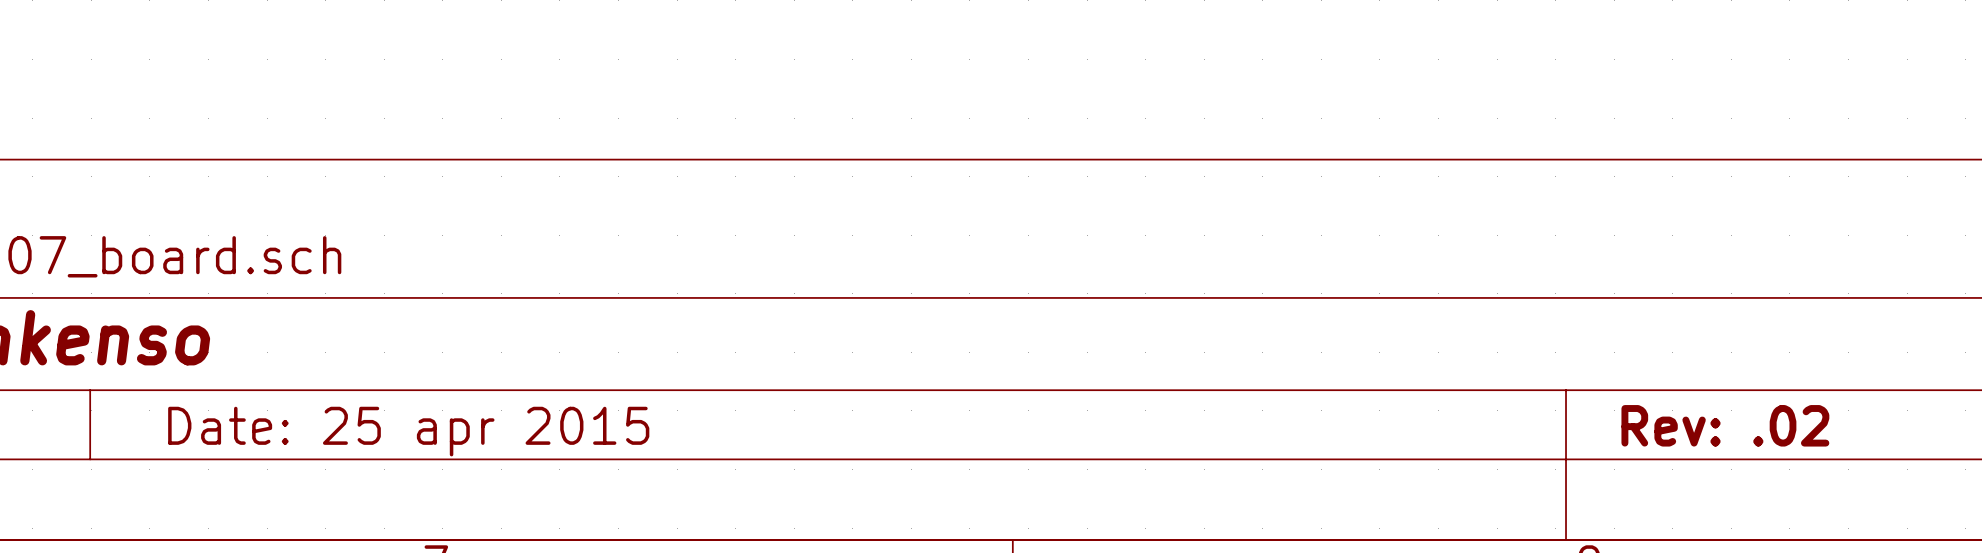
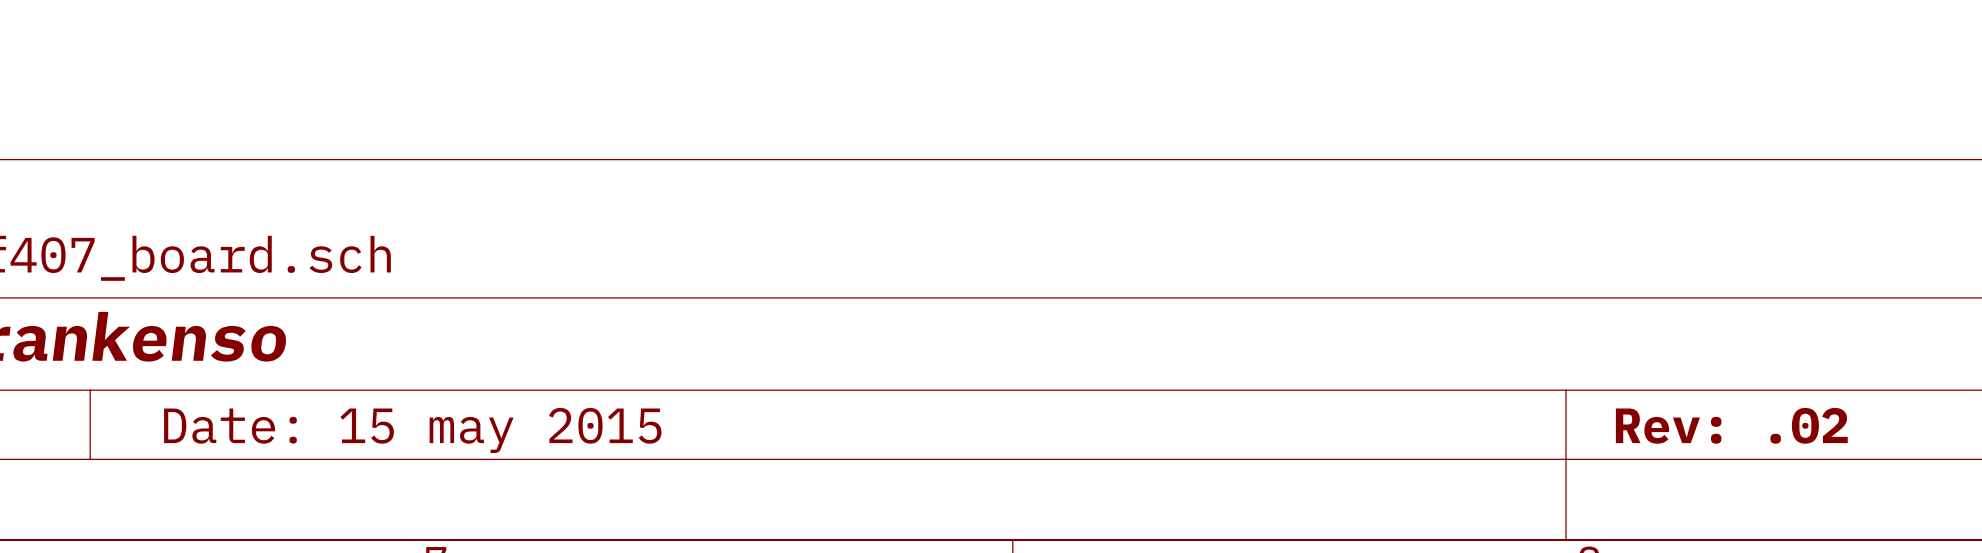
title block: Date: 25 apr 2015 (408, 431) -> Date: 15 may 2015 (412, 430)

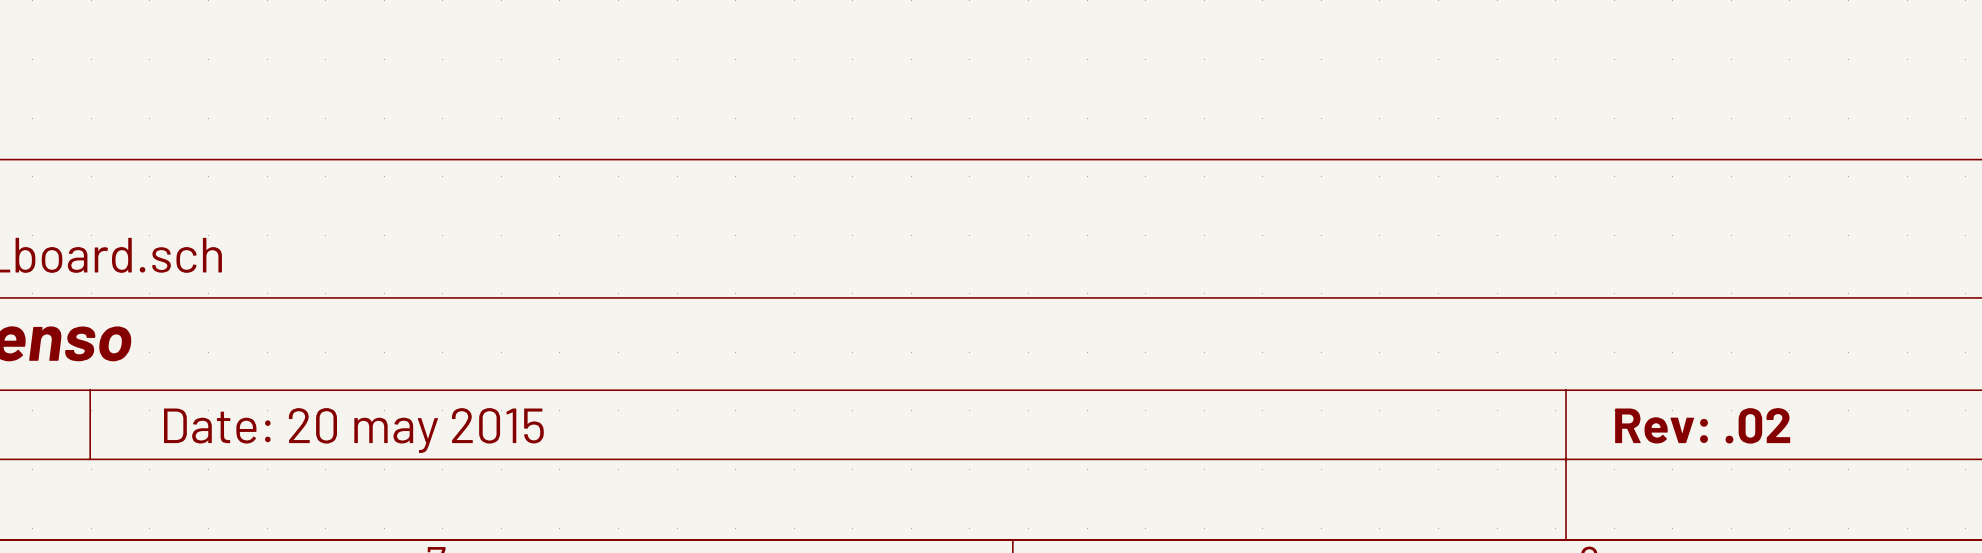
title block: Date: 15 may 2015 (412, 430) -> Date: 20 may 2015 (353, 430)

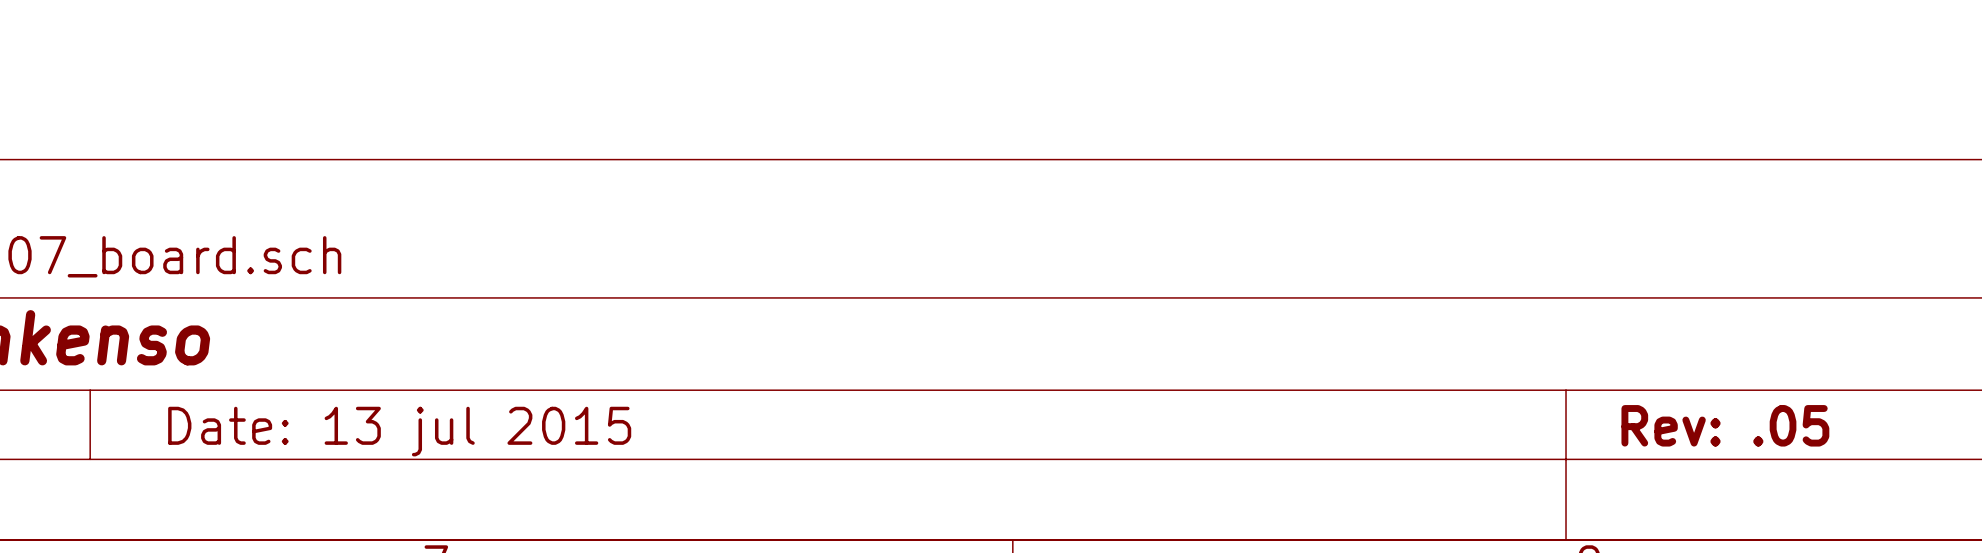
title block: Rev: .02 (1702, 425) -> Rev: .05 (1725, 425)
title block: Date: 20 may 2015 (353, 430) -> Date: 13 jul 2015 (399, 431)

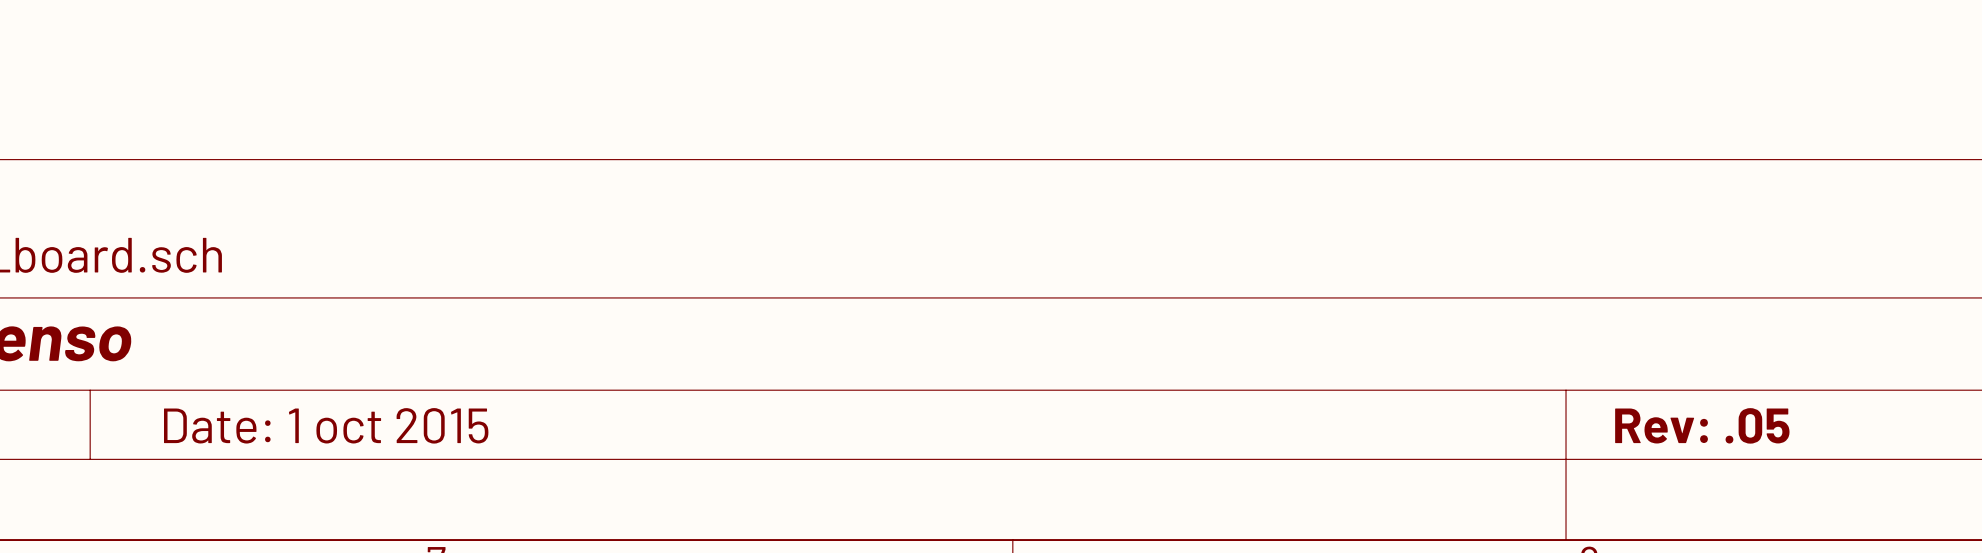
title block: Date: 13 jul 2015 (399, 431) -> Date: 1 oct 2015 (326, 425)

